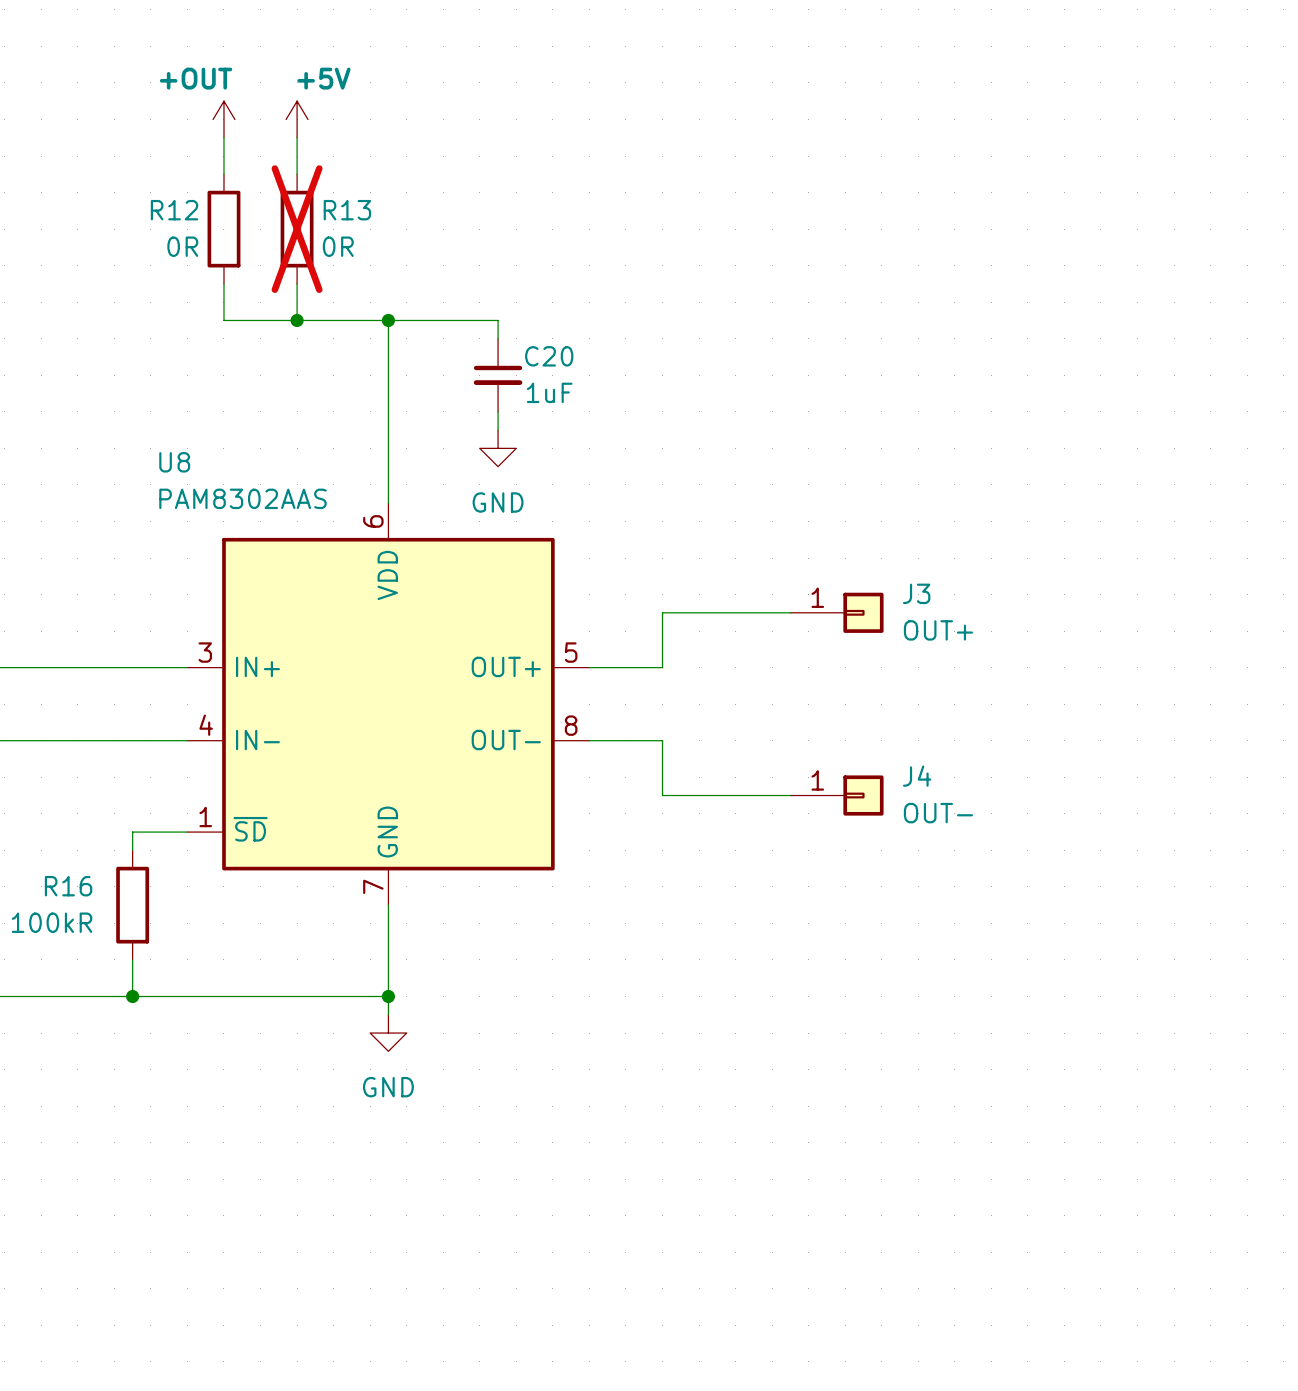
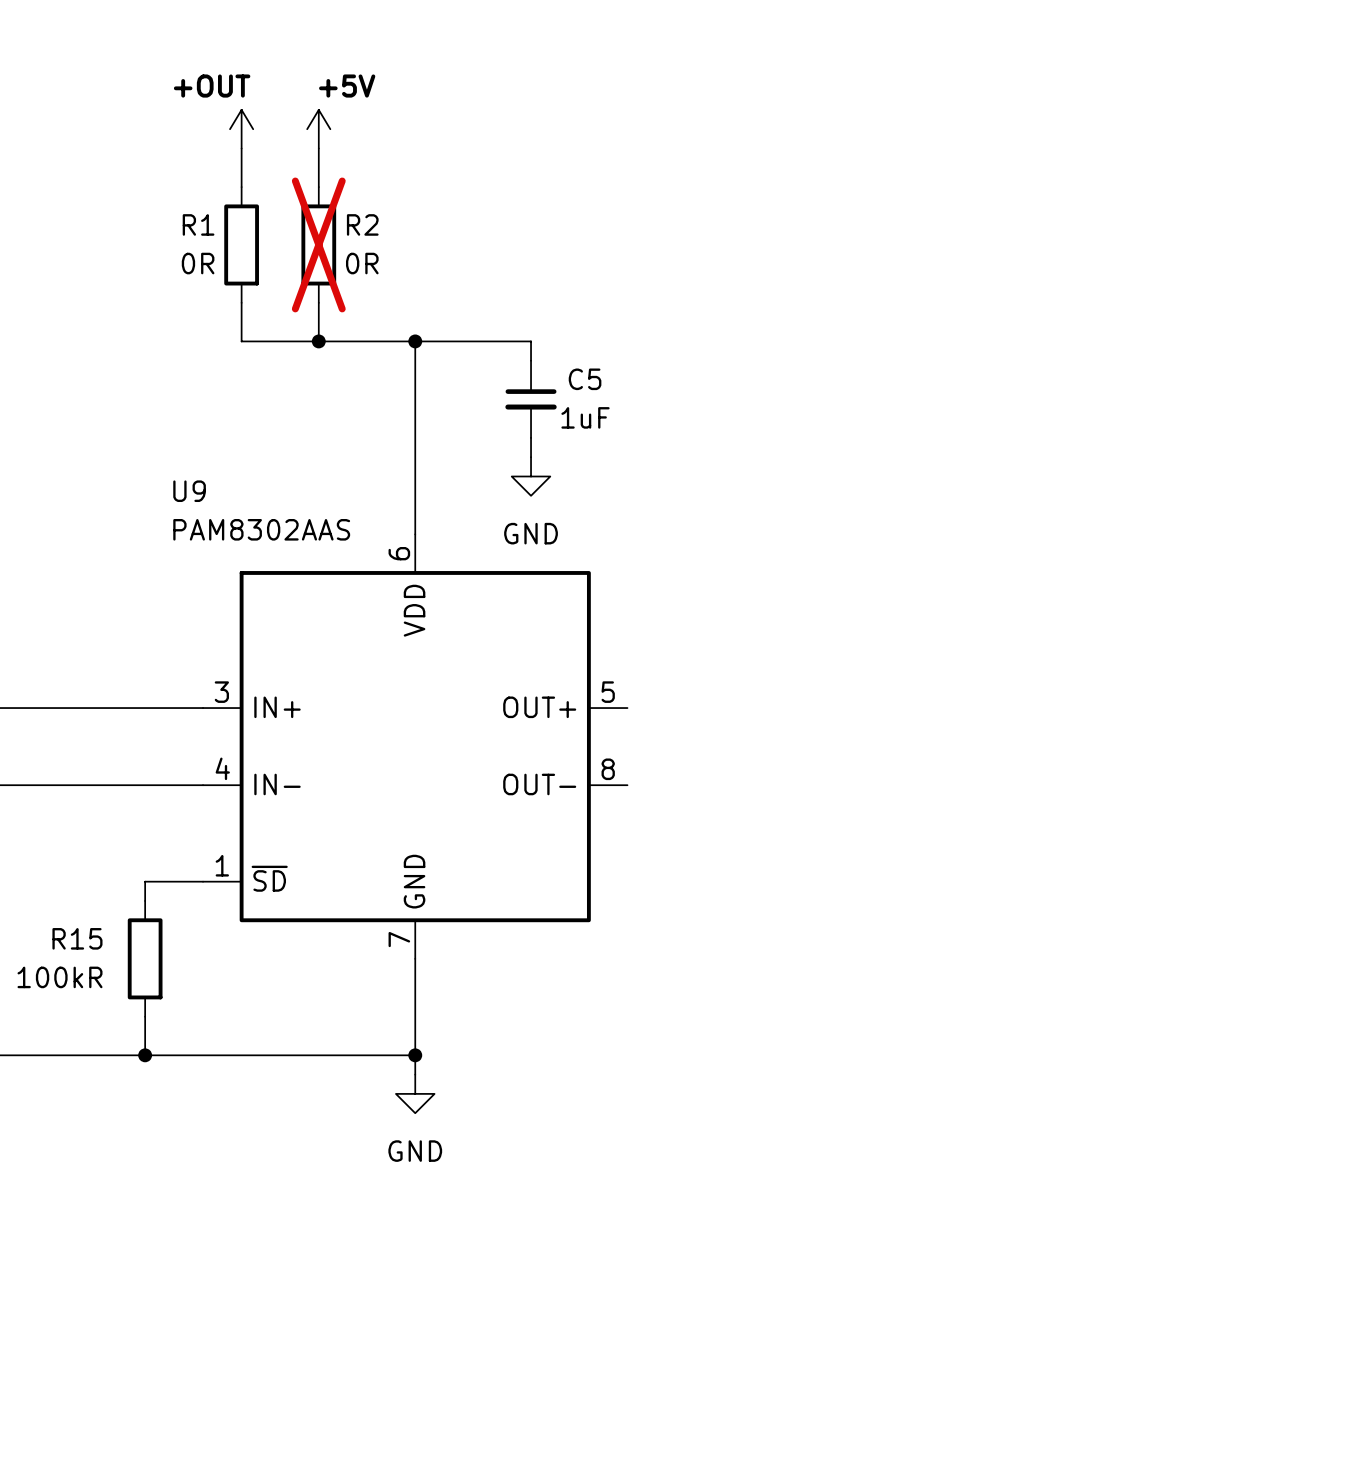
R12 name: R12 (174, 210) -> R1 (198, 224)
R13 name: R13 (347, 210) -> R2 (362, 224)
C20 name: C20 (549, 356) -> C5 (585, 379)
U8 name: U8 (174, 462) -> U9 (189, 491)
wire: (790, 612) (662, 612) (662, 667) (589, 667) -> none
J3: OUT+ (836, 612) -> none
wire: (589, 740) (662, 740) (662, 795) (790, 795) -> none
J4: OUT- (836, 795) -> none
R16 name: R16 (68, 886) -> R15 (77, 938)

